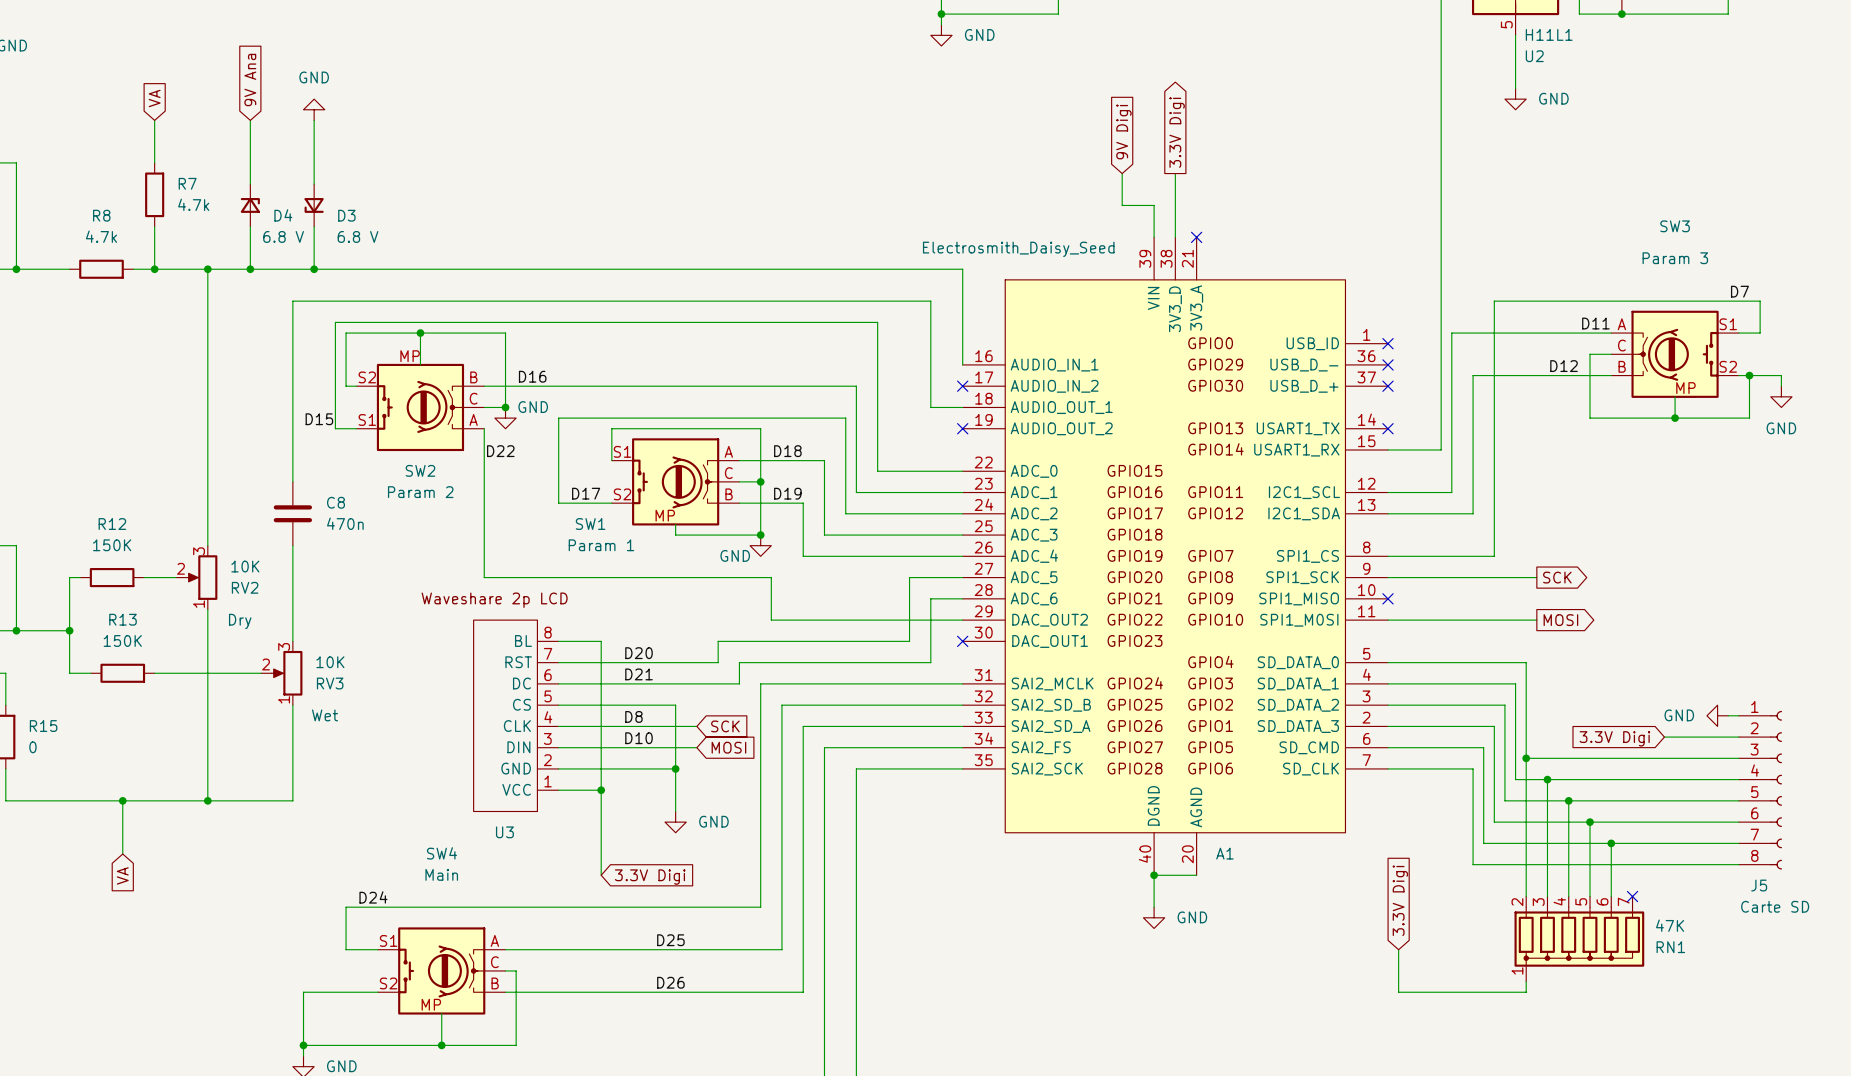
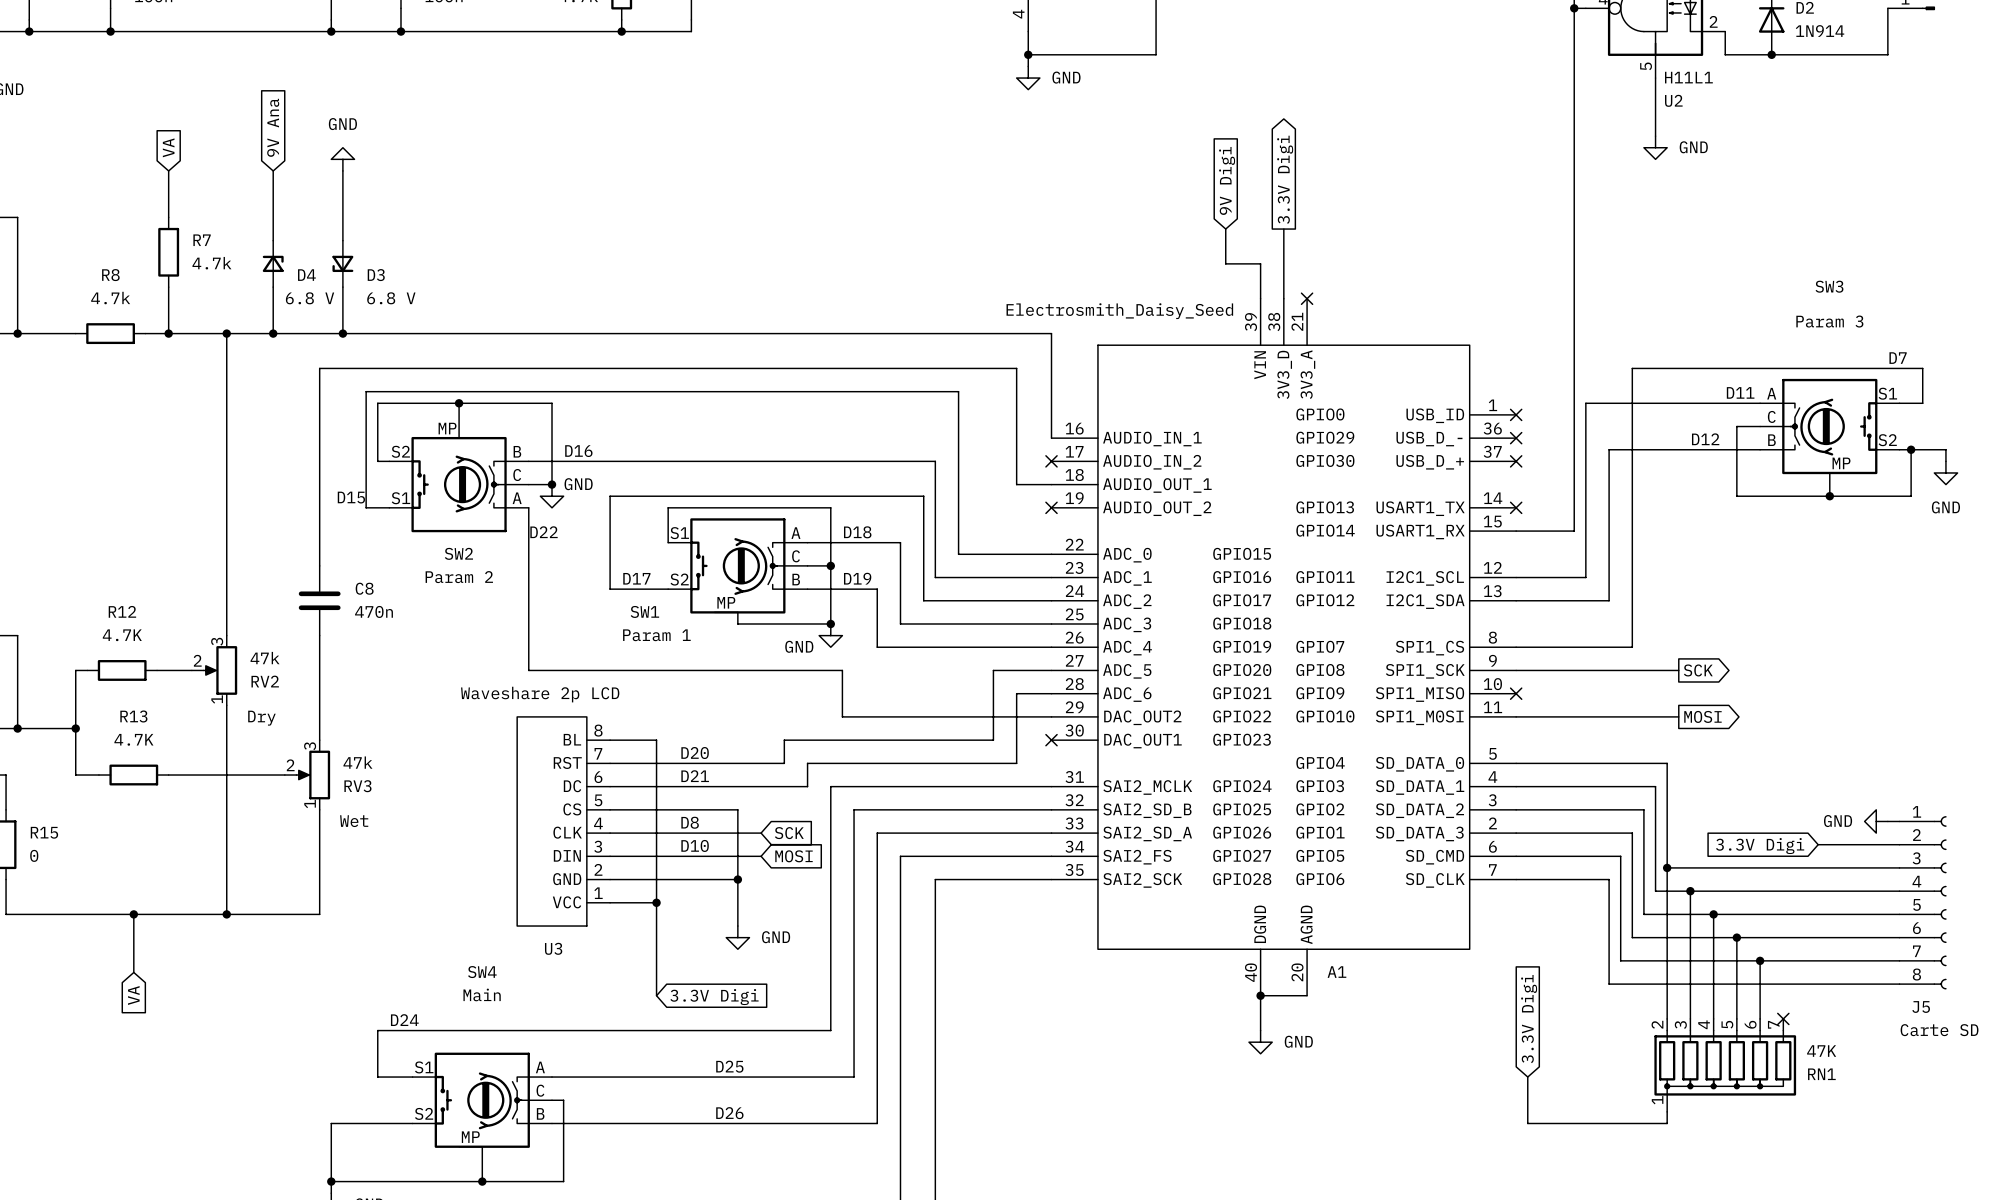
R12 value: 150K (112, 545) -> 4.7K (122, 635)
RV2 value: 10K (245, 566) -> 47k (265, 658)
R13 value: 150K (122, 640) -> 4.7K (133, 739)
RV3 value: 10K (330, 662) -> 47k (357, 762)

